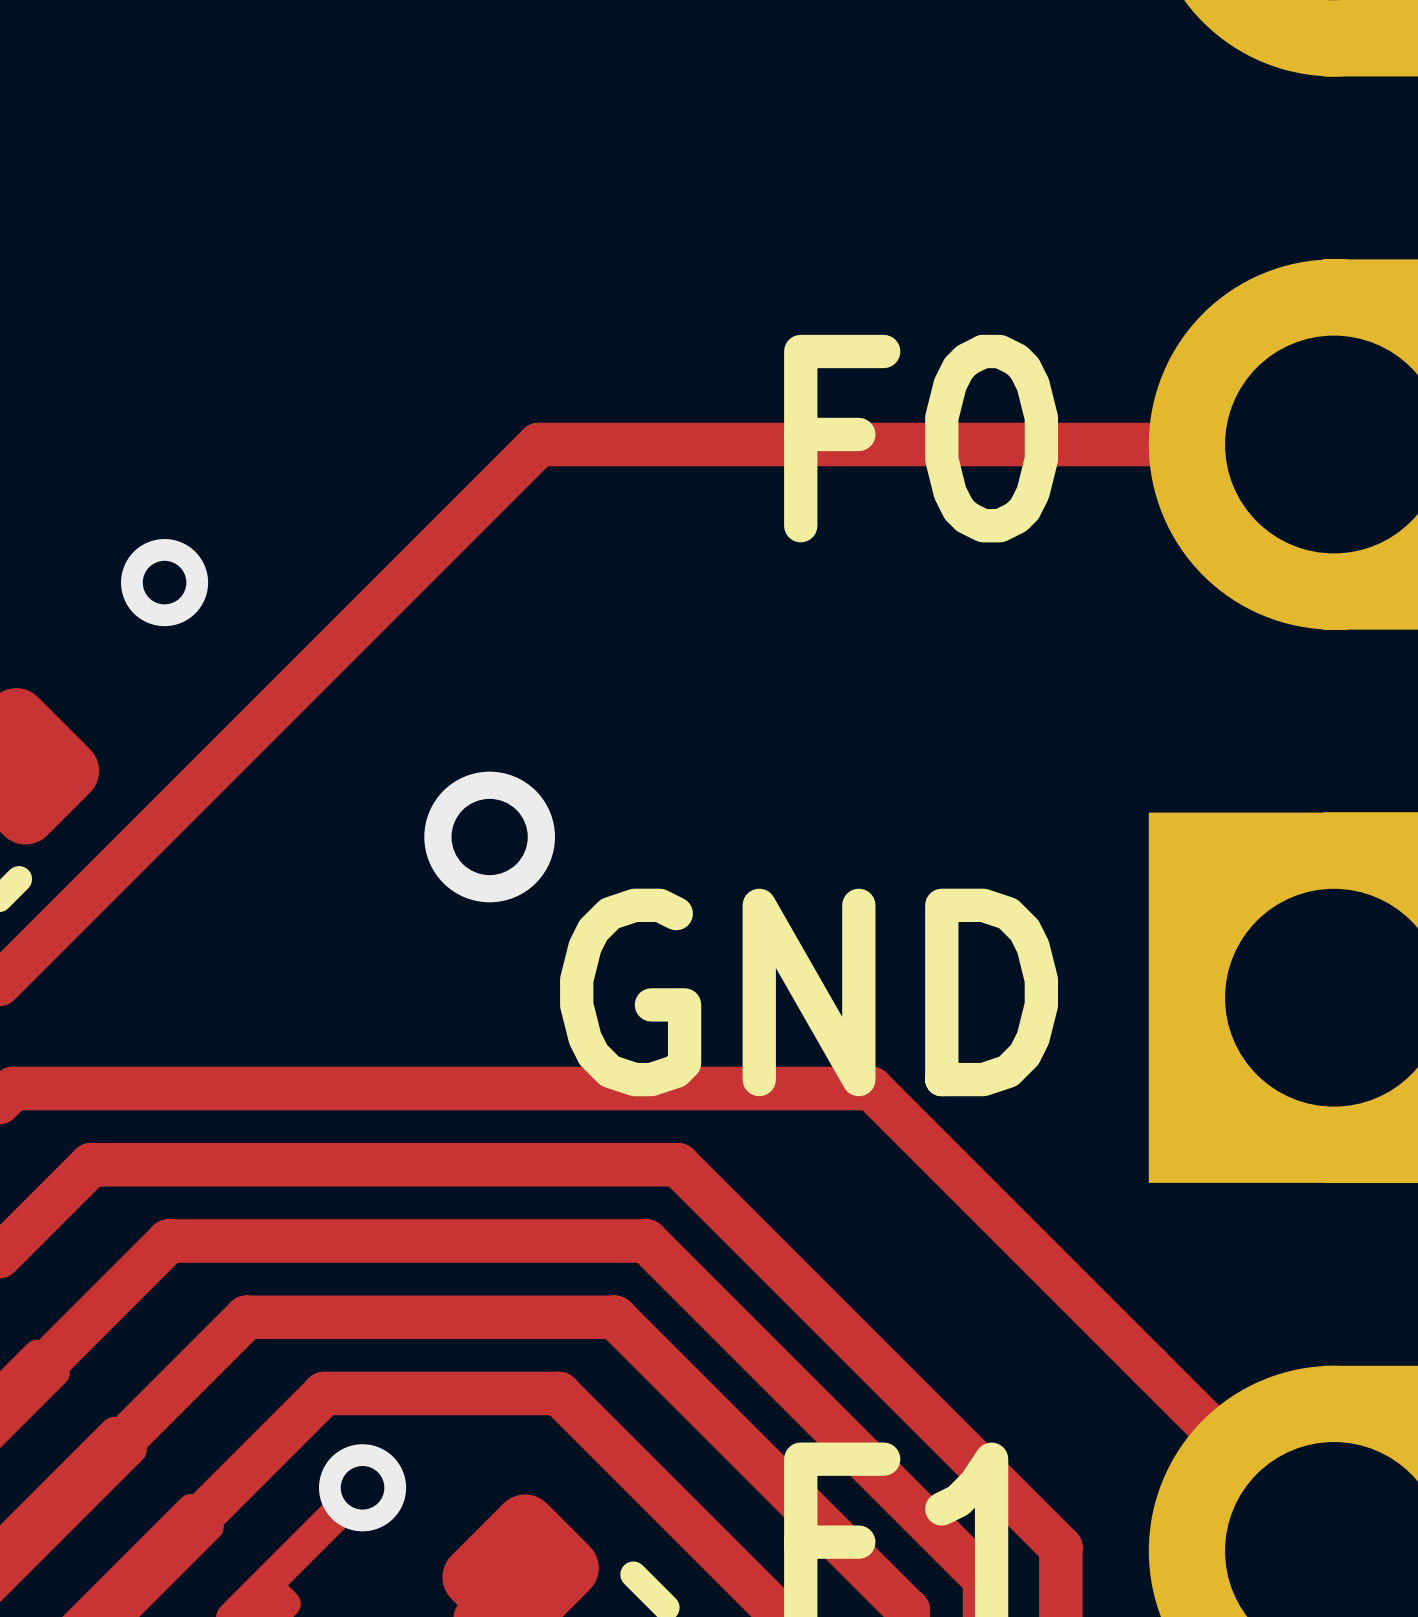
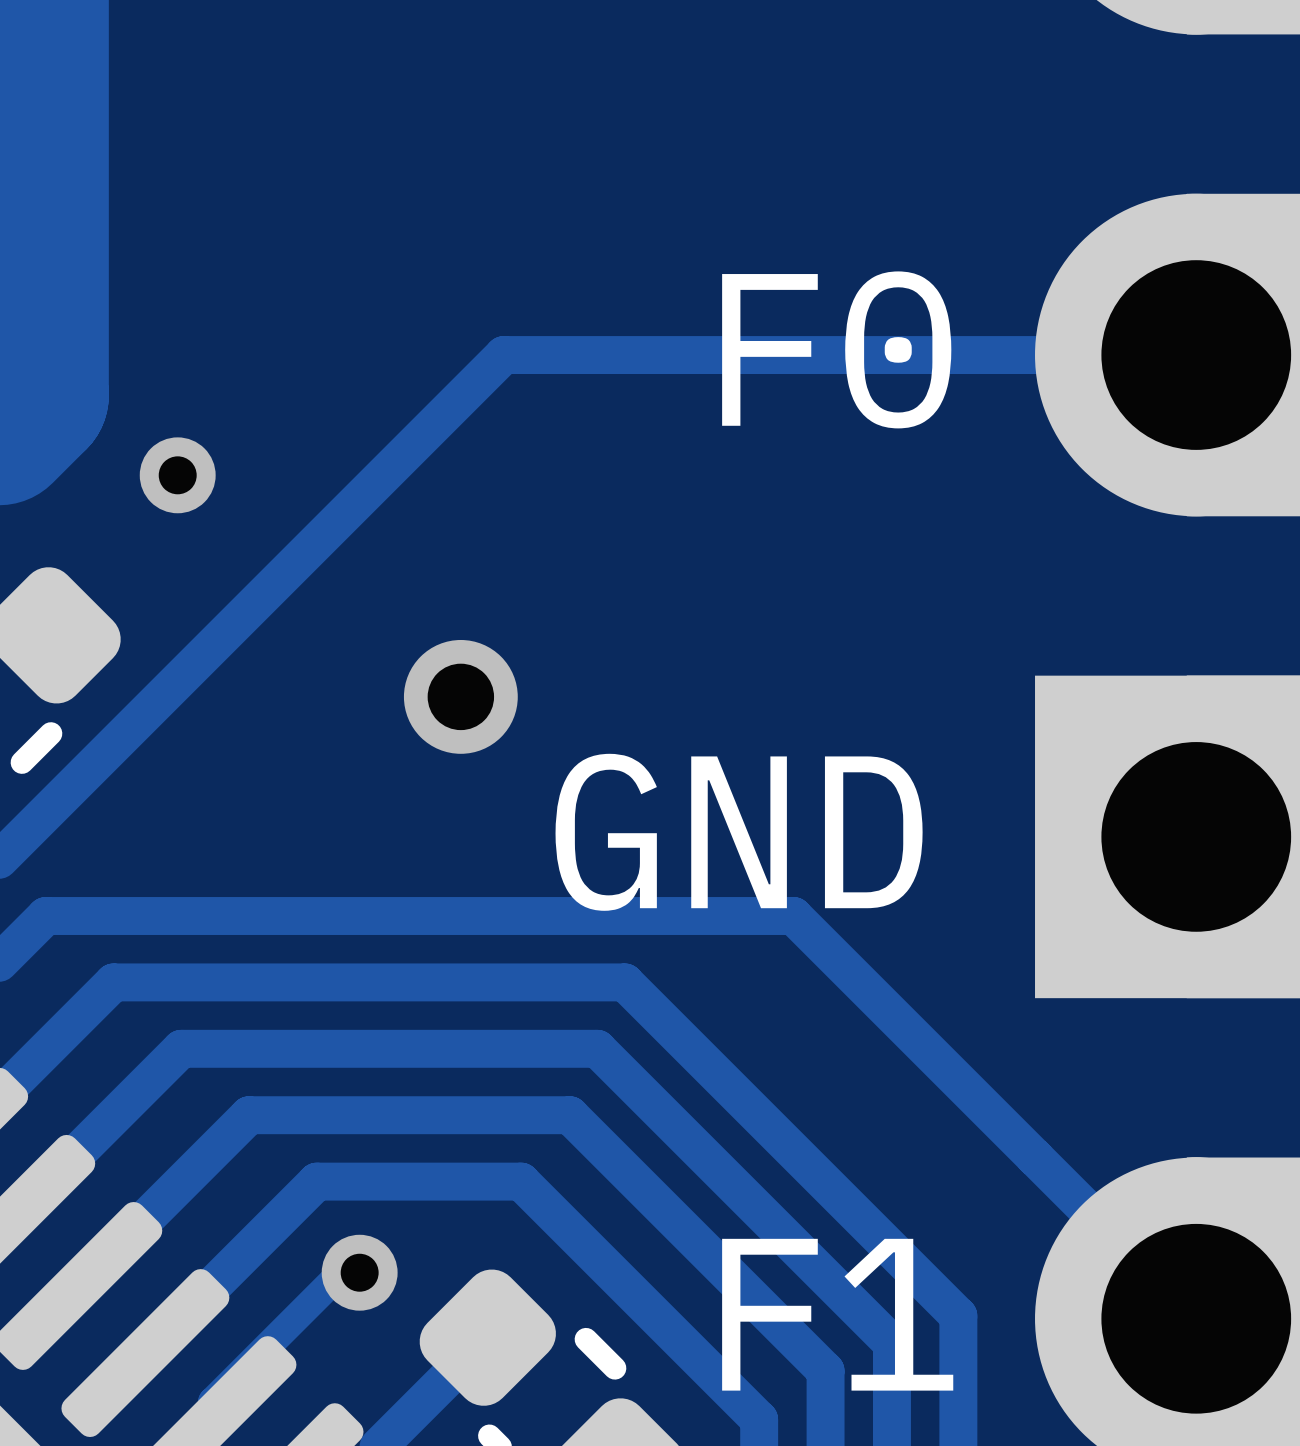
via position: (362, 1487) -> (359, 1272)

